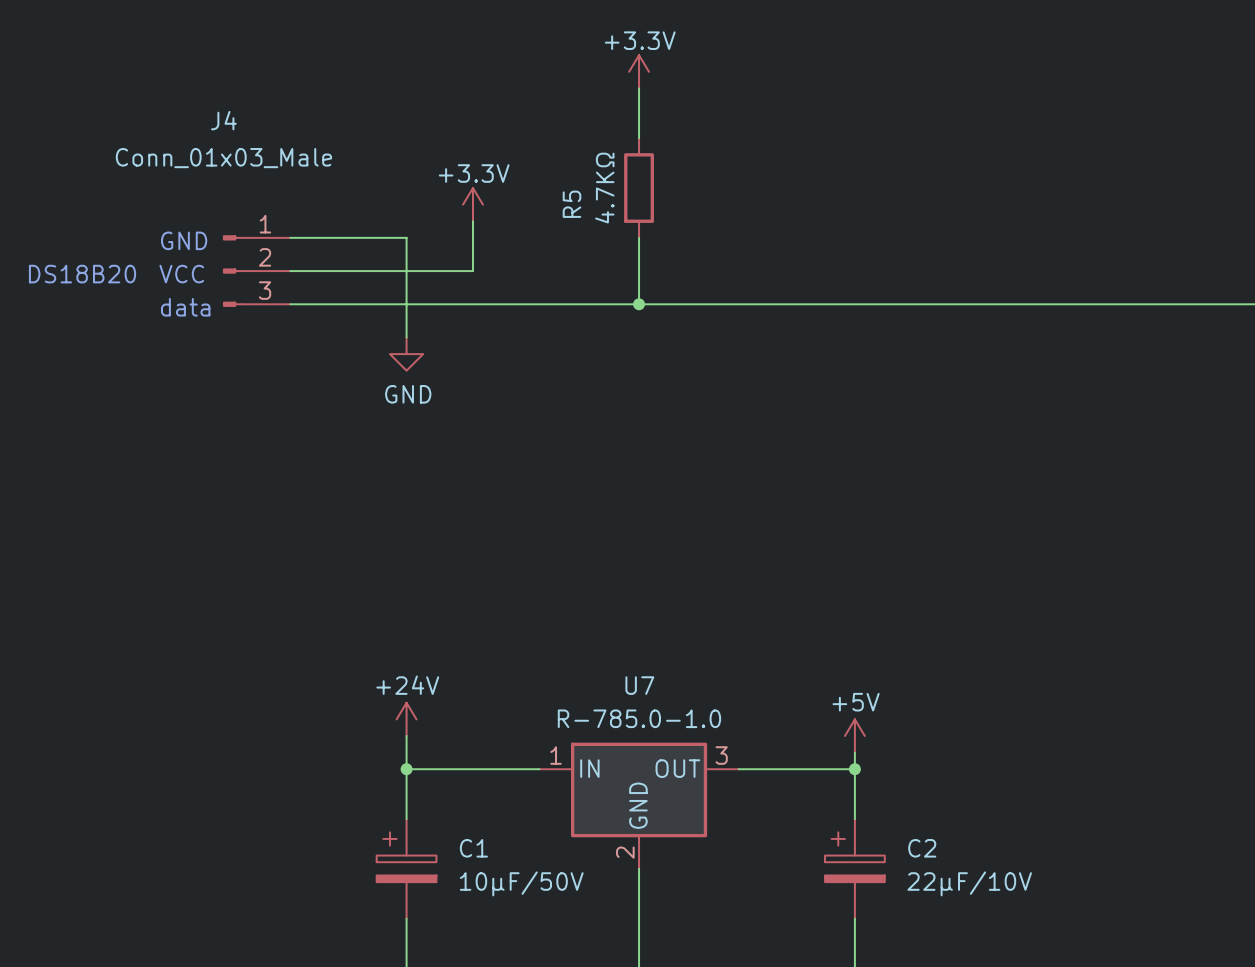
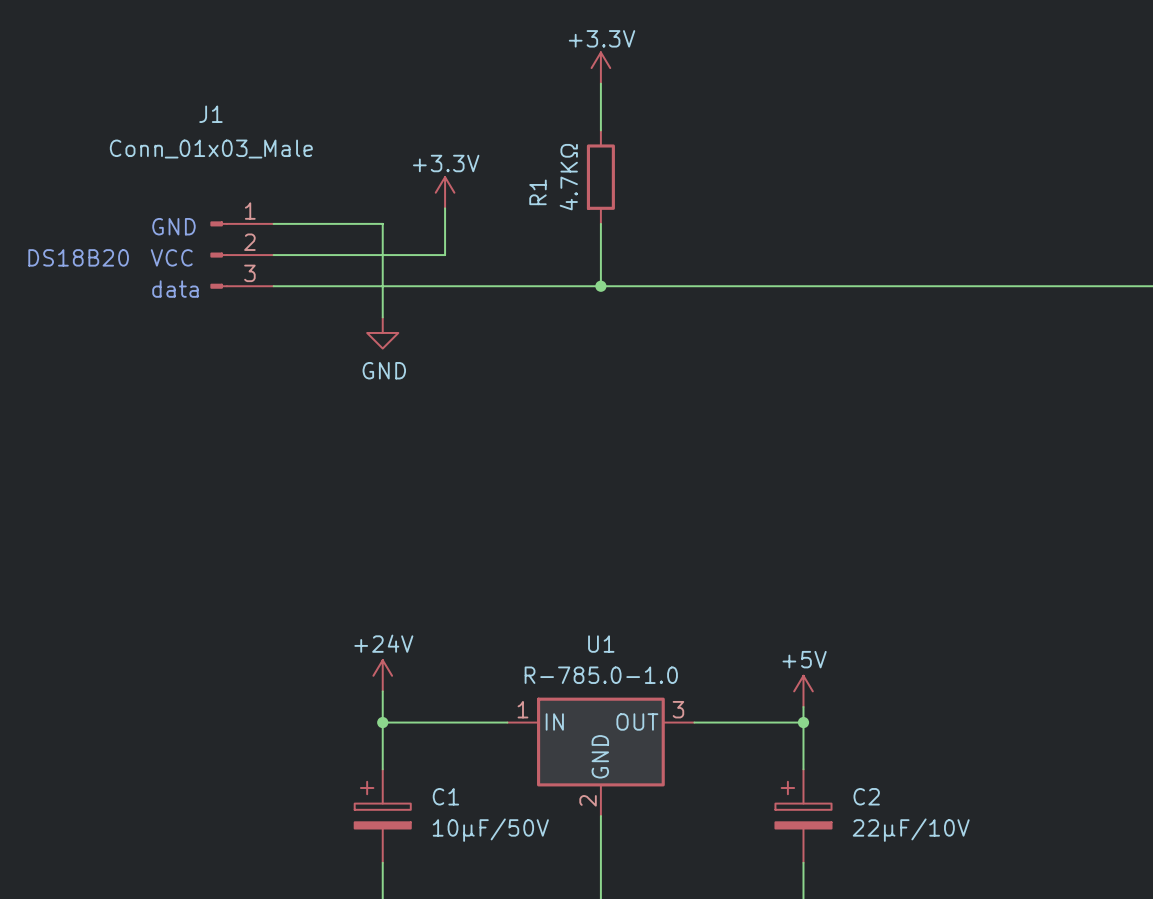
J4 name: J4 (223, 120) -> J1 (210, 114)
R5 name: R5 (572, 204) -> R1 (537, 192)
U7 name: U7 (639, 685) -> U1 (601, 644)

